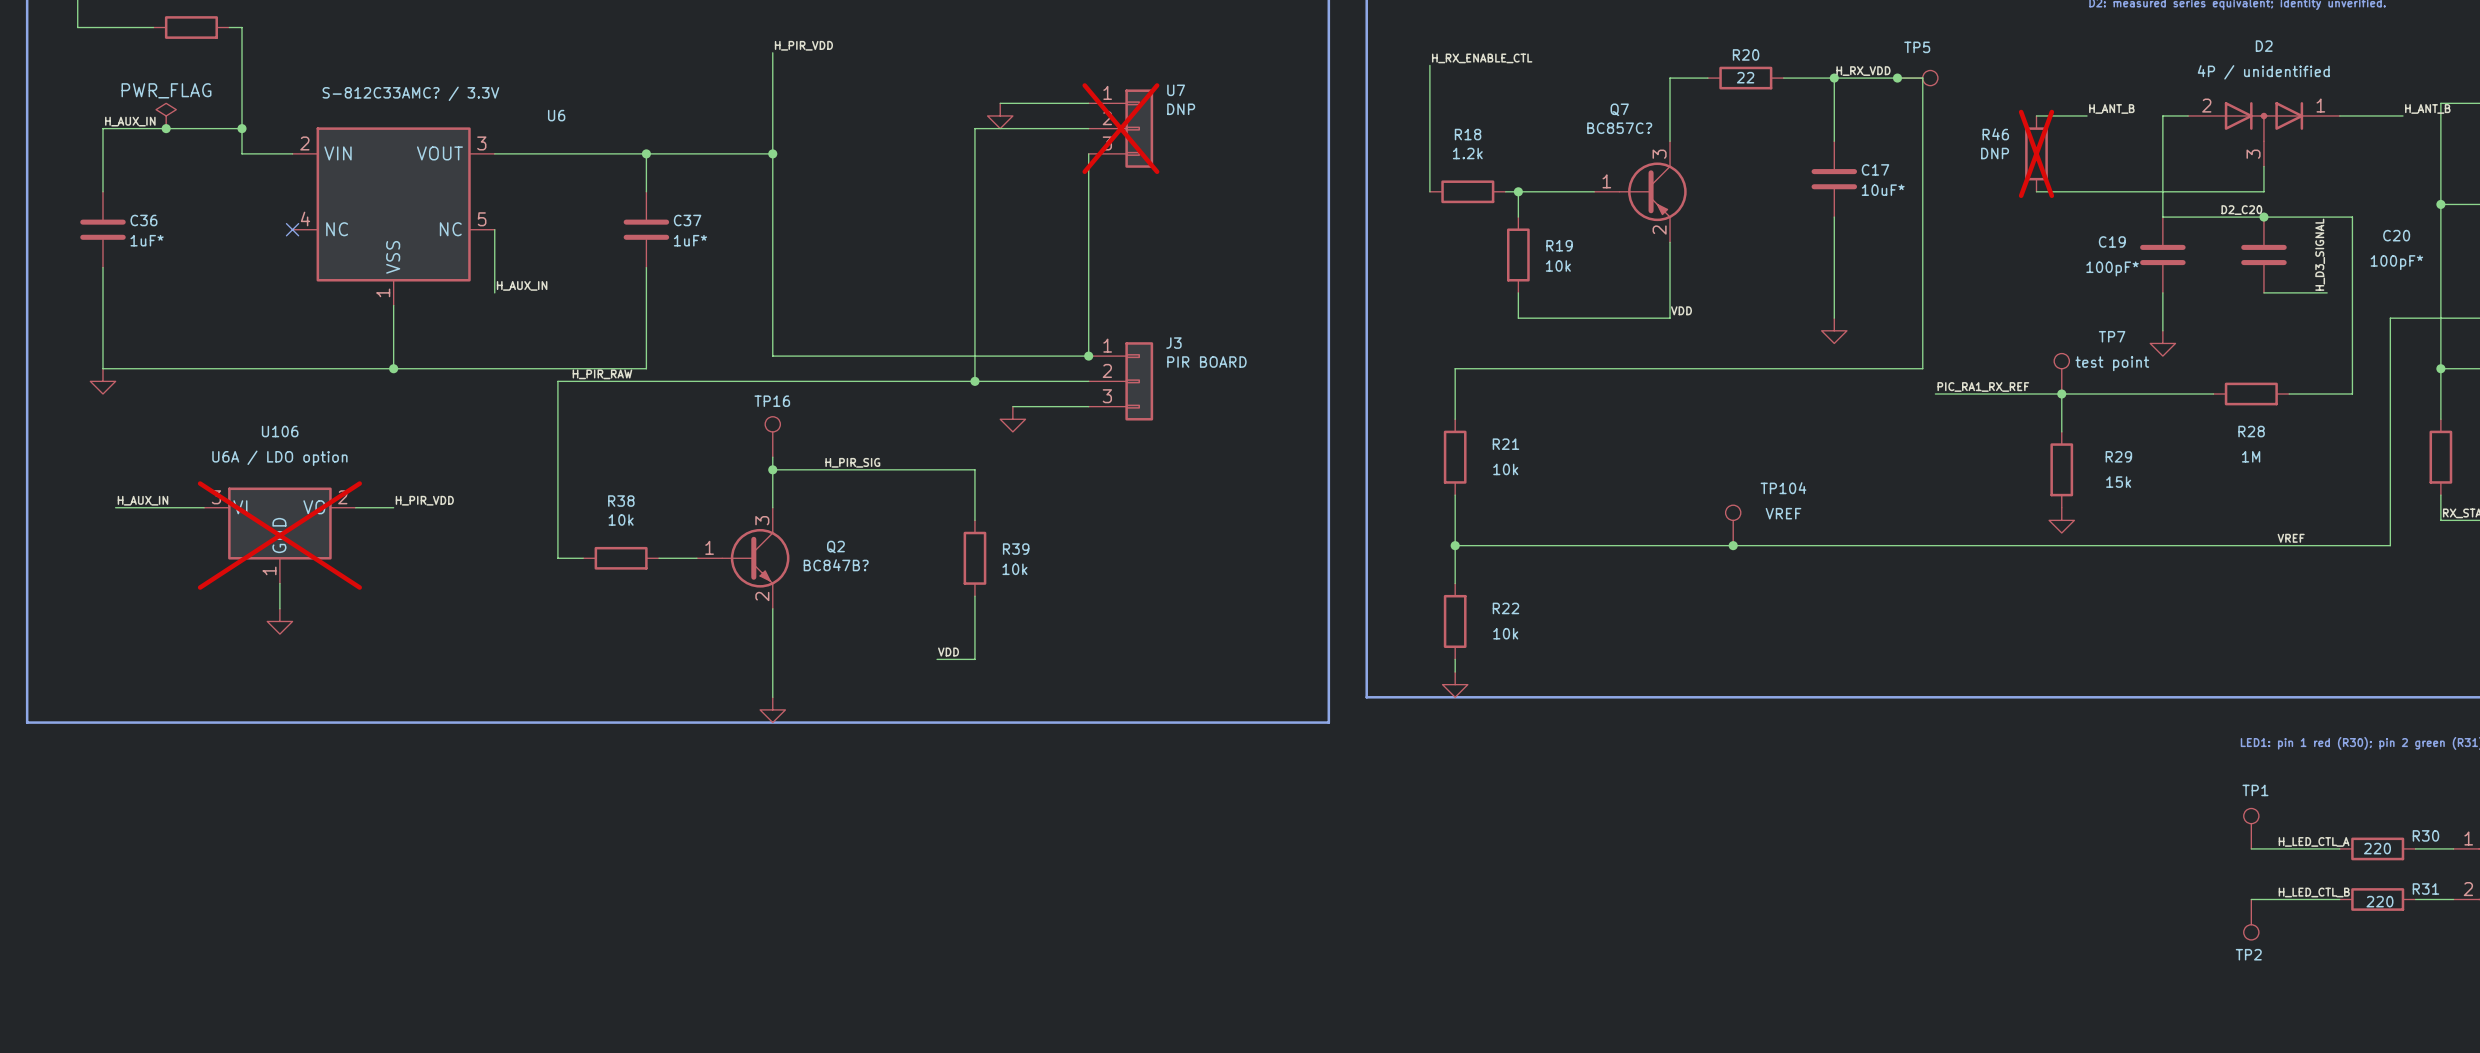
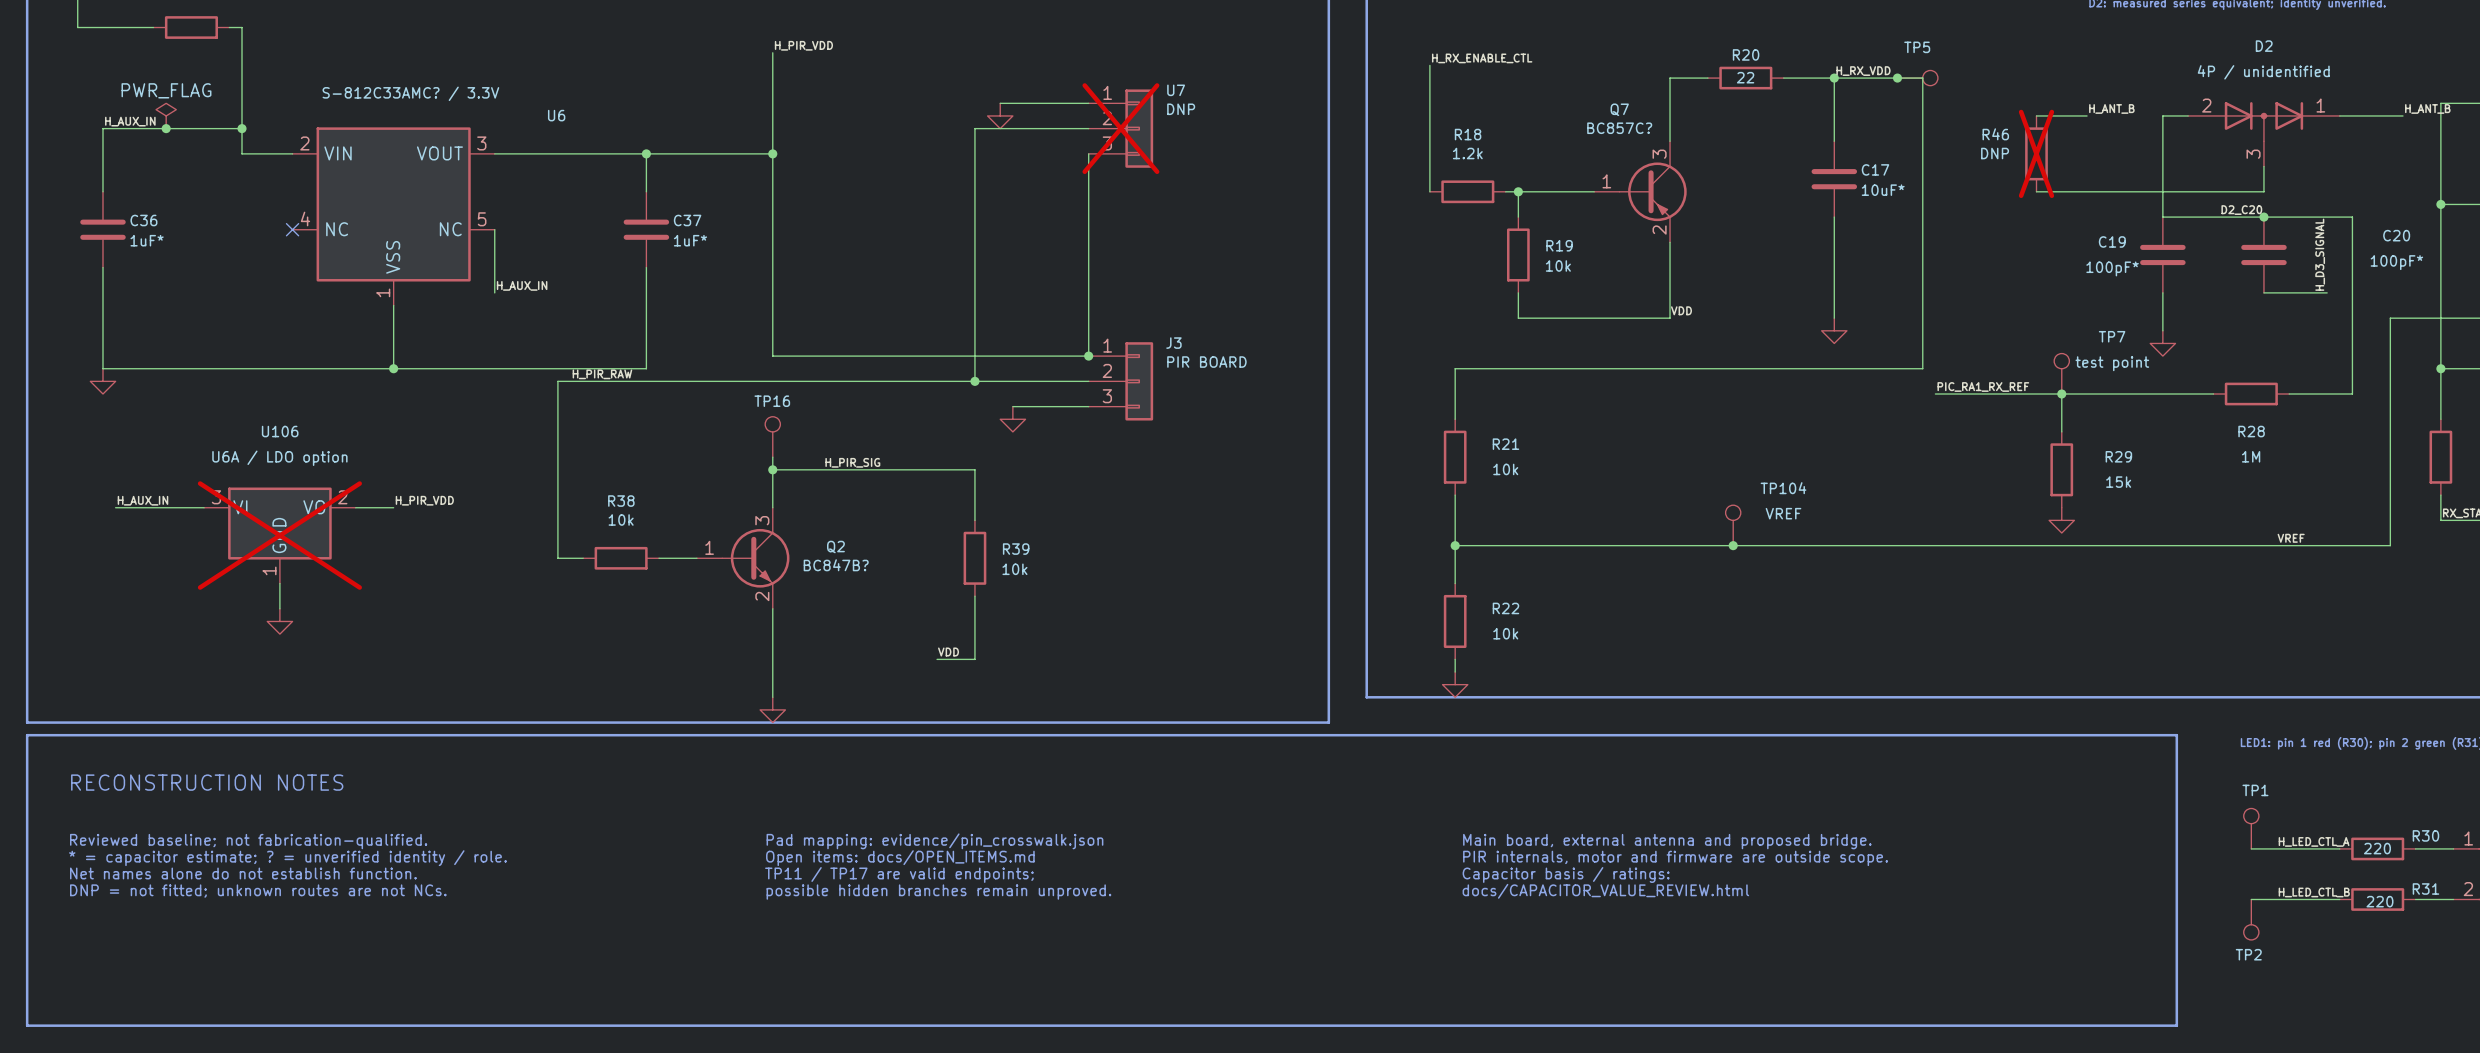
line: none -> (27, 735) (2176, 735) (2176, 1025) (27, 1025) (27, 735)
text: none -> RECONSTRUCTION NOTES (207, 782)
text: none -> Reviewed baseline; not fabrication-qualified. (248, 841)
text: none -> Pad mapping: evidence/pin_crosswalk.json (934, 841)
text: none -> Main board, external antenna and proposed bridge. (1667, 841)
text: none -> * = capacitor estimate; ? = unverified identity / role. (287, 858)
text: none -> Open items: docs/OPEN_ITEMS.md (900, 858)
text: none -> PIR internals, motor and firmware are outside scope. (1675, 858)
text: none -> Net names alone do not establish function. (243, 873)
text: none -> TP11 / TP17 are valid endpoints; (899, 874)
text: none -> Capacitor basis / ratings: (1566, 874)
text: none -> DNP = not fitted; unknown routes are not NCs. (258, 891)
text: none -> docs/CAPACITOR_VALUE_REVIEW.html (1605, 891)
text: none -> possible hidden branches remain unproved. (938, 892)

